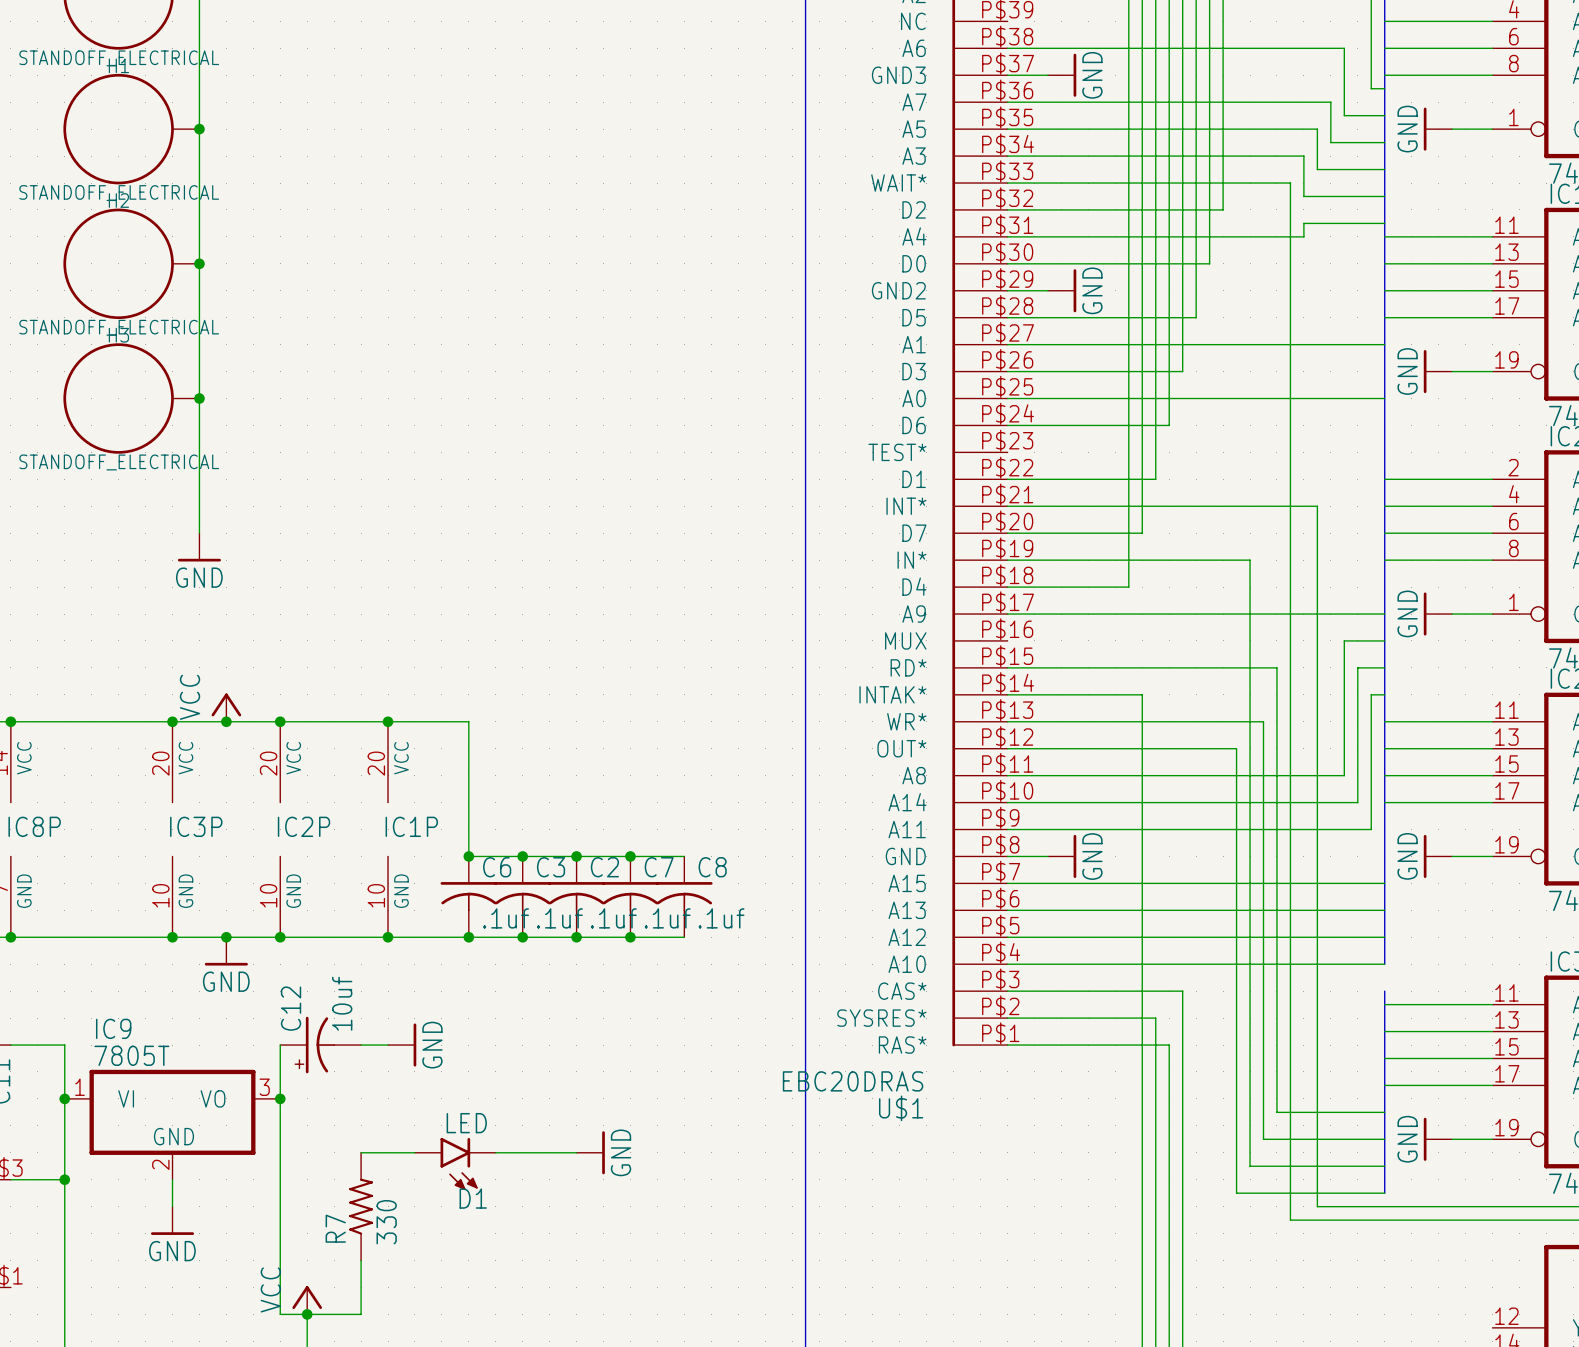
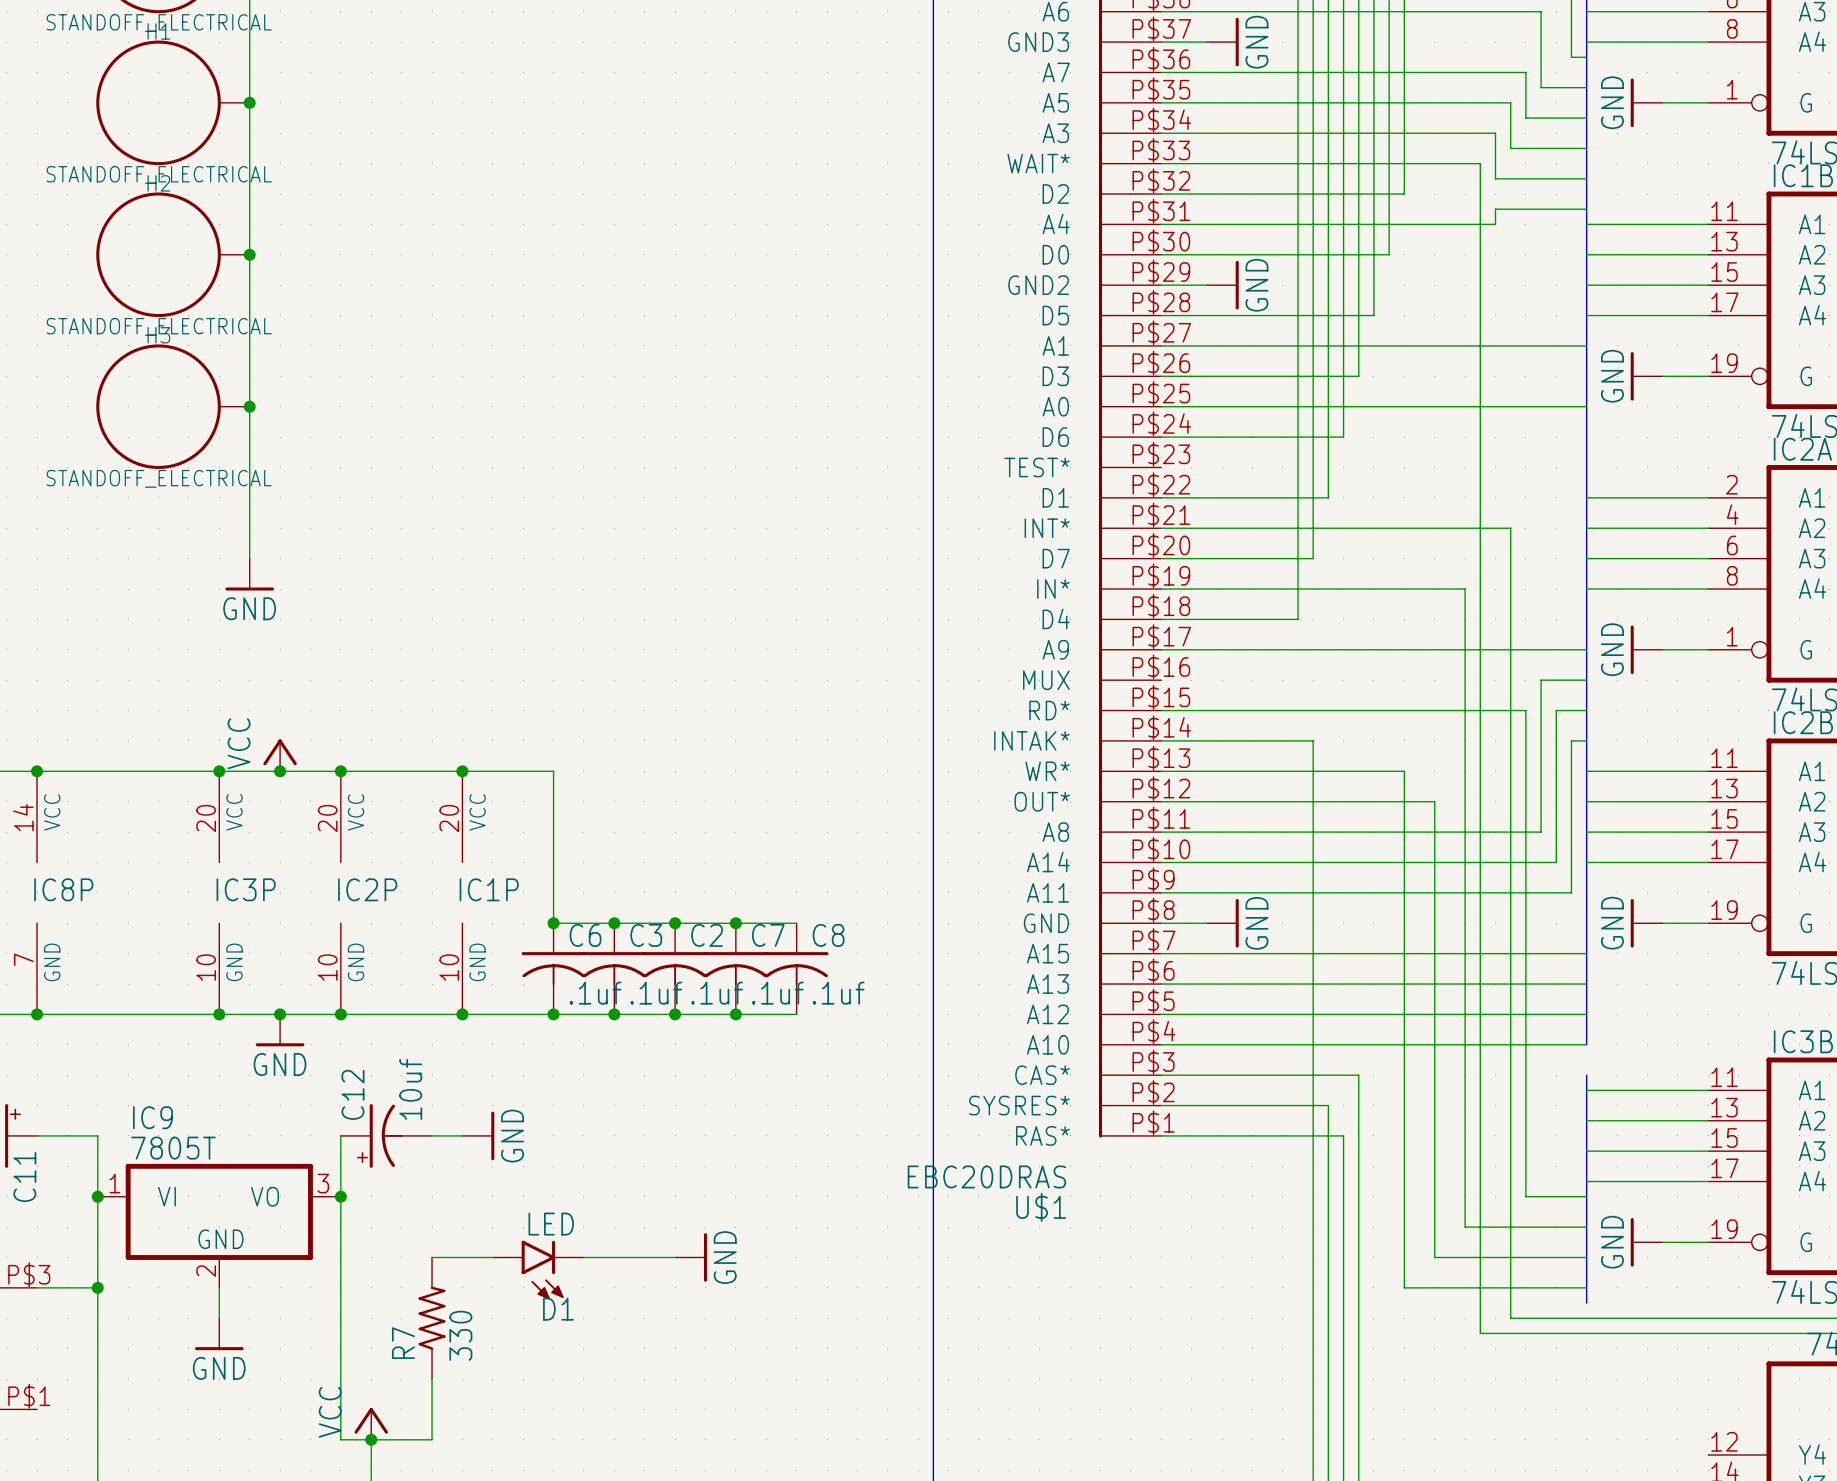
wire: (1250, 560) (1250, 748) -> (1419, 801) (1434, 801)
wire: none -> (1434, 589) (1465, 589) (1465, 710) (1525, 710) (1525, 1196) (1586, 1196)
wire: (1223, 721) (1263, 721) (1263, 1139) (1384, 1139) -> (1404, 771) (1404, 1287) (1586, 1287)
wire: (1236, 748) (1236, 1193) (1384, 1193) -> none
wire: (1276, 1112) (1384, 1112) -> (1465, 1211) (1465, 1227) (1586, 1227)
wire: (1250, 1152) (1250, 1166) (1384, 1166) -> (1434, 1257) (1586, 1257)

